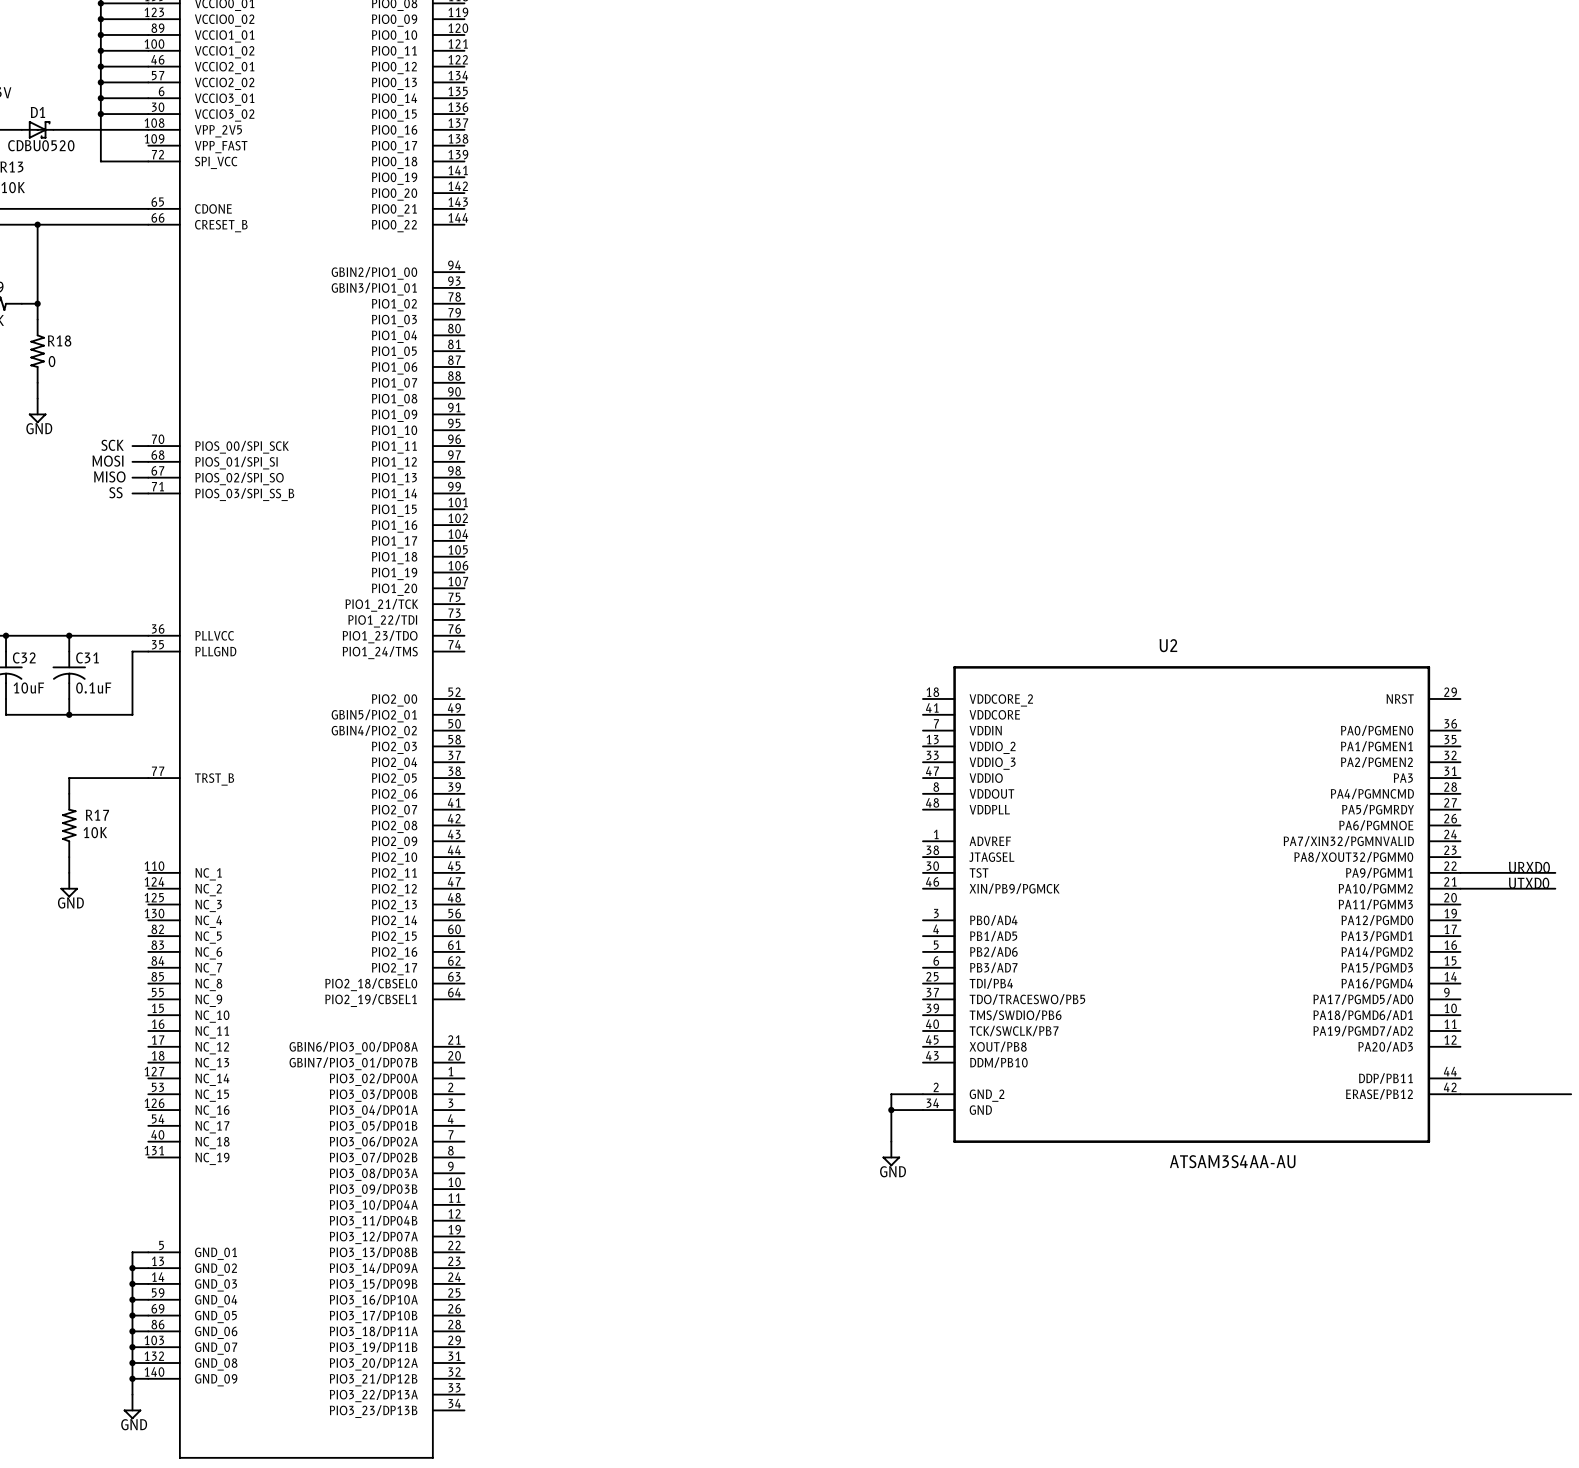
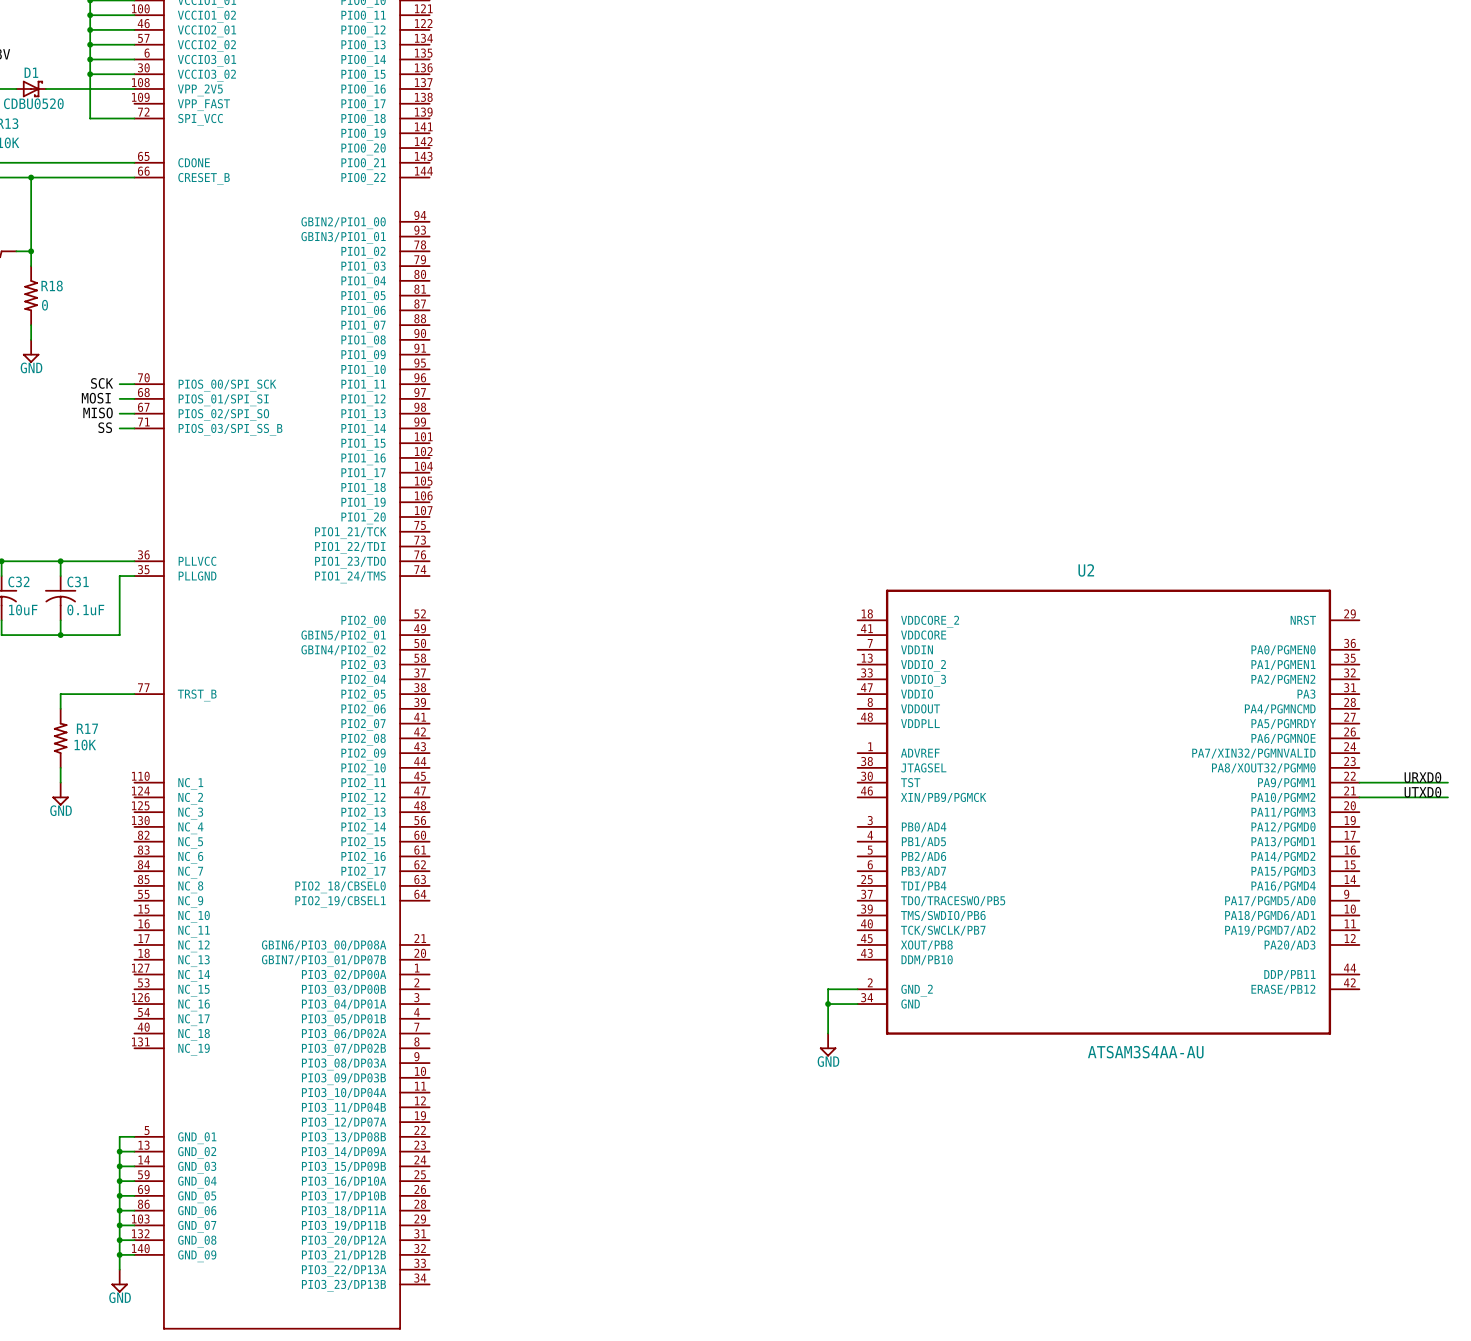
wire: (1460, 1094) (1571, 1094) -> none

